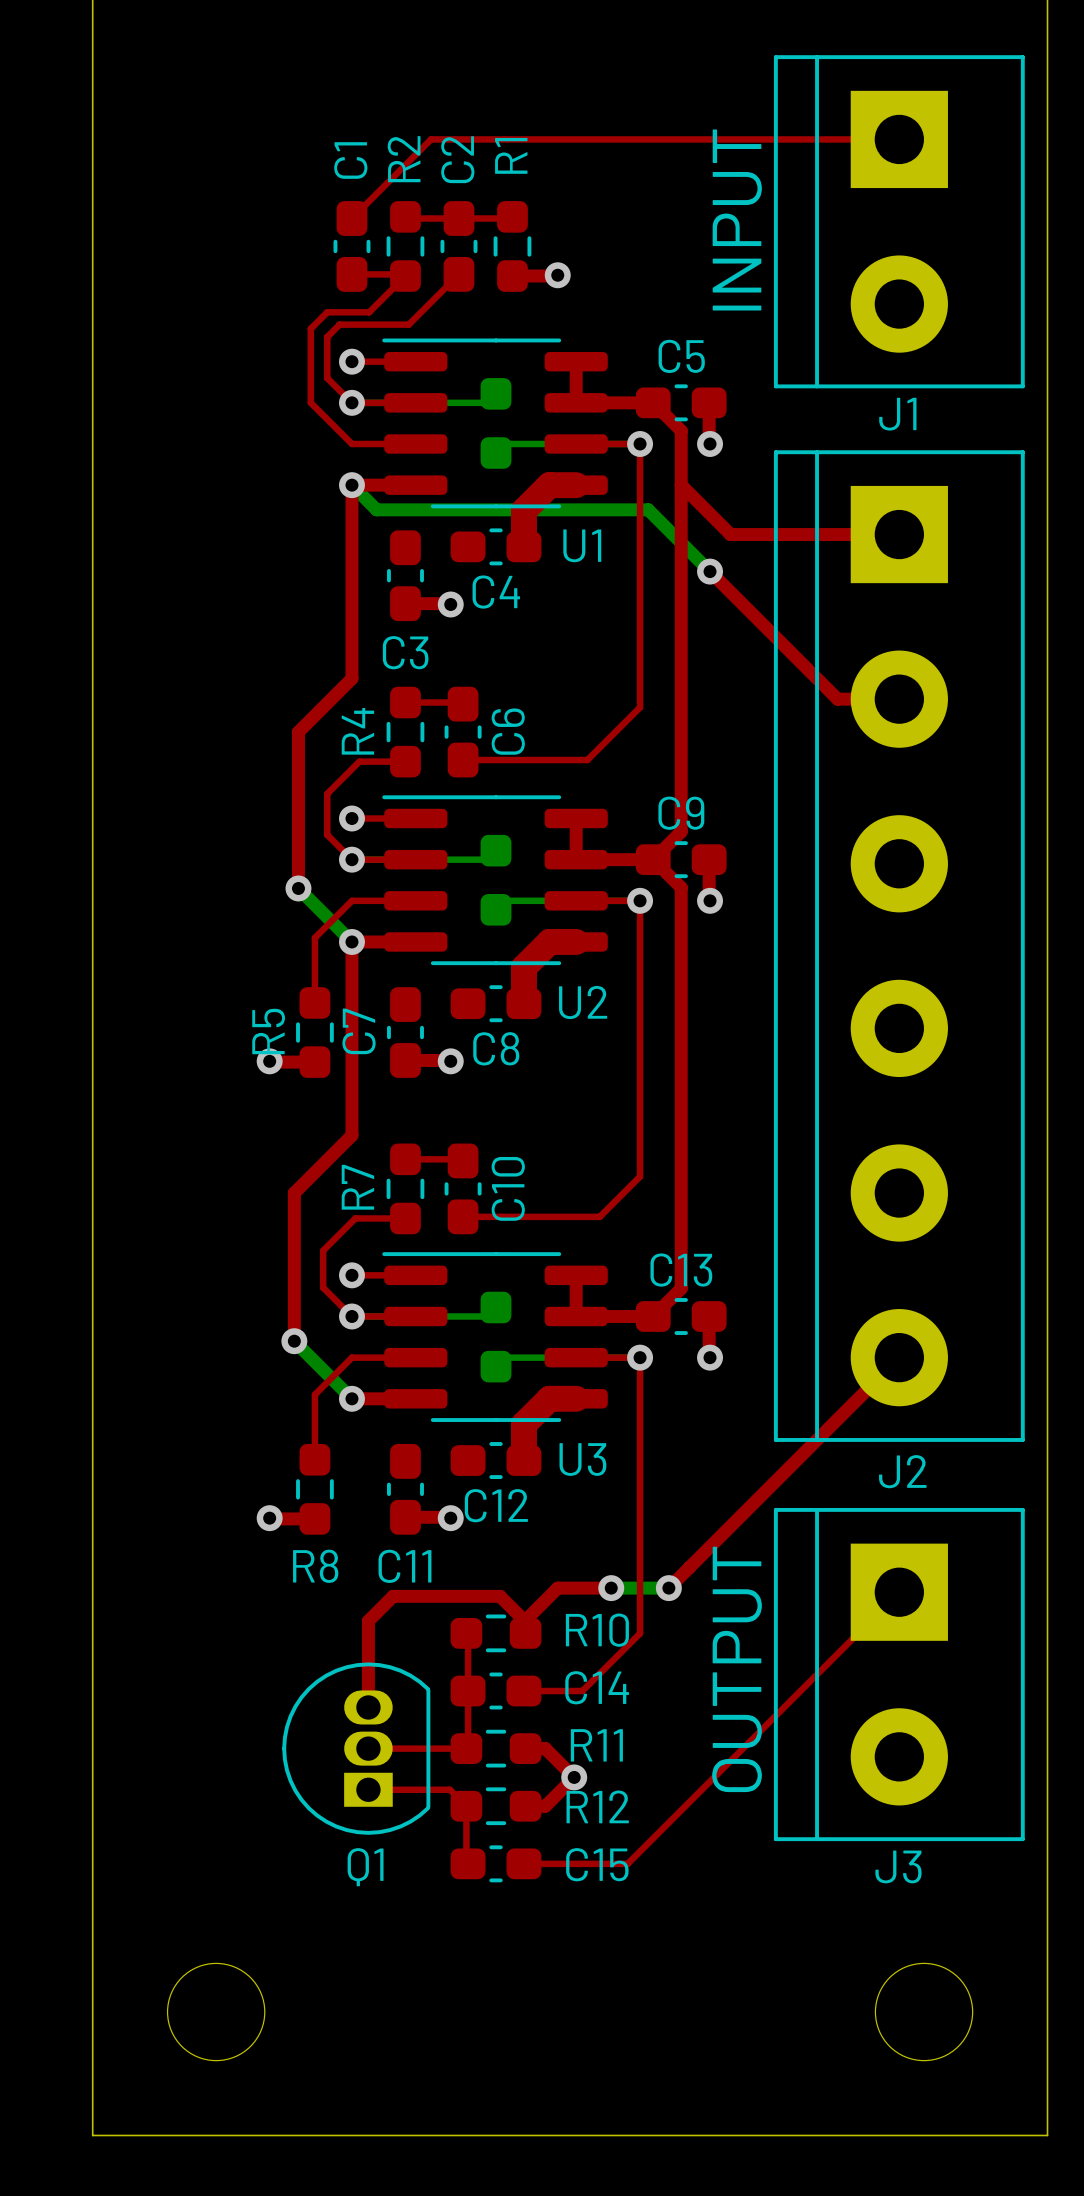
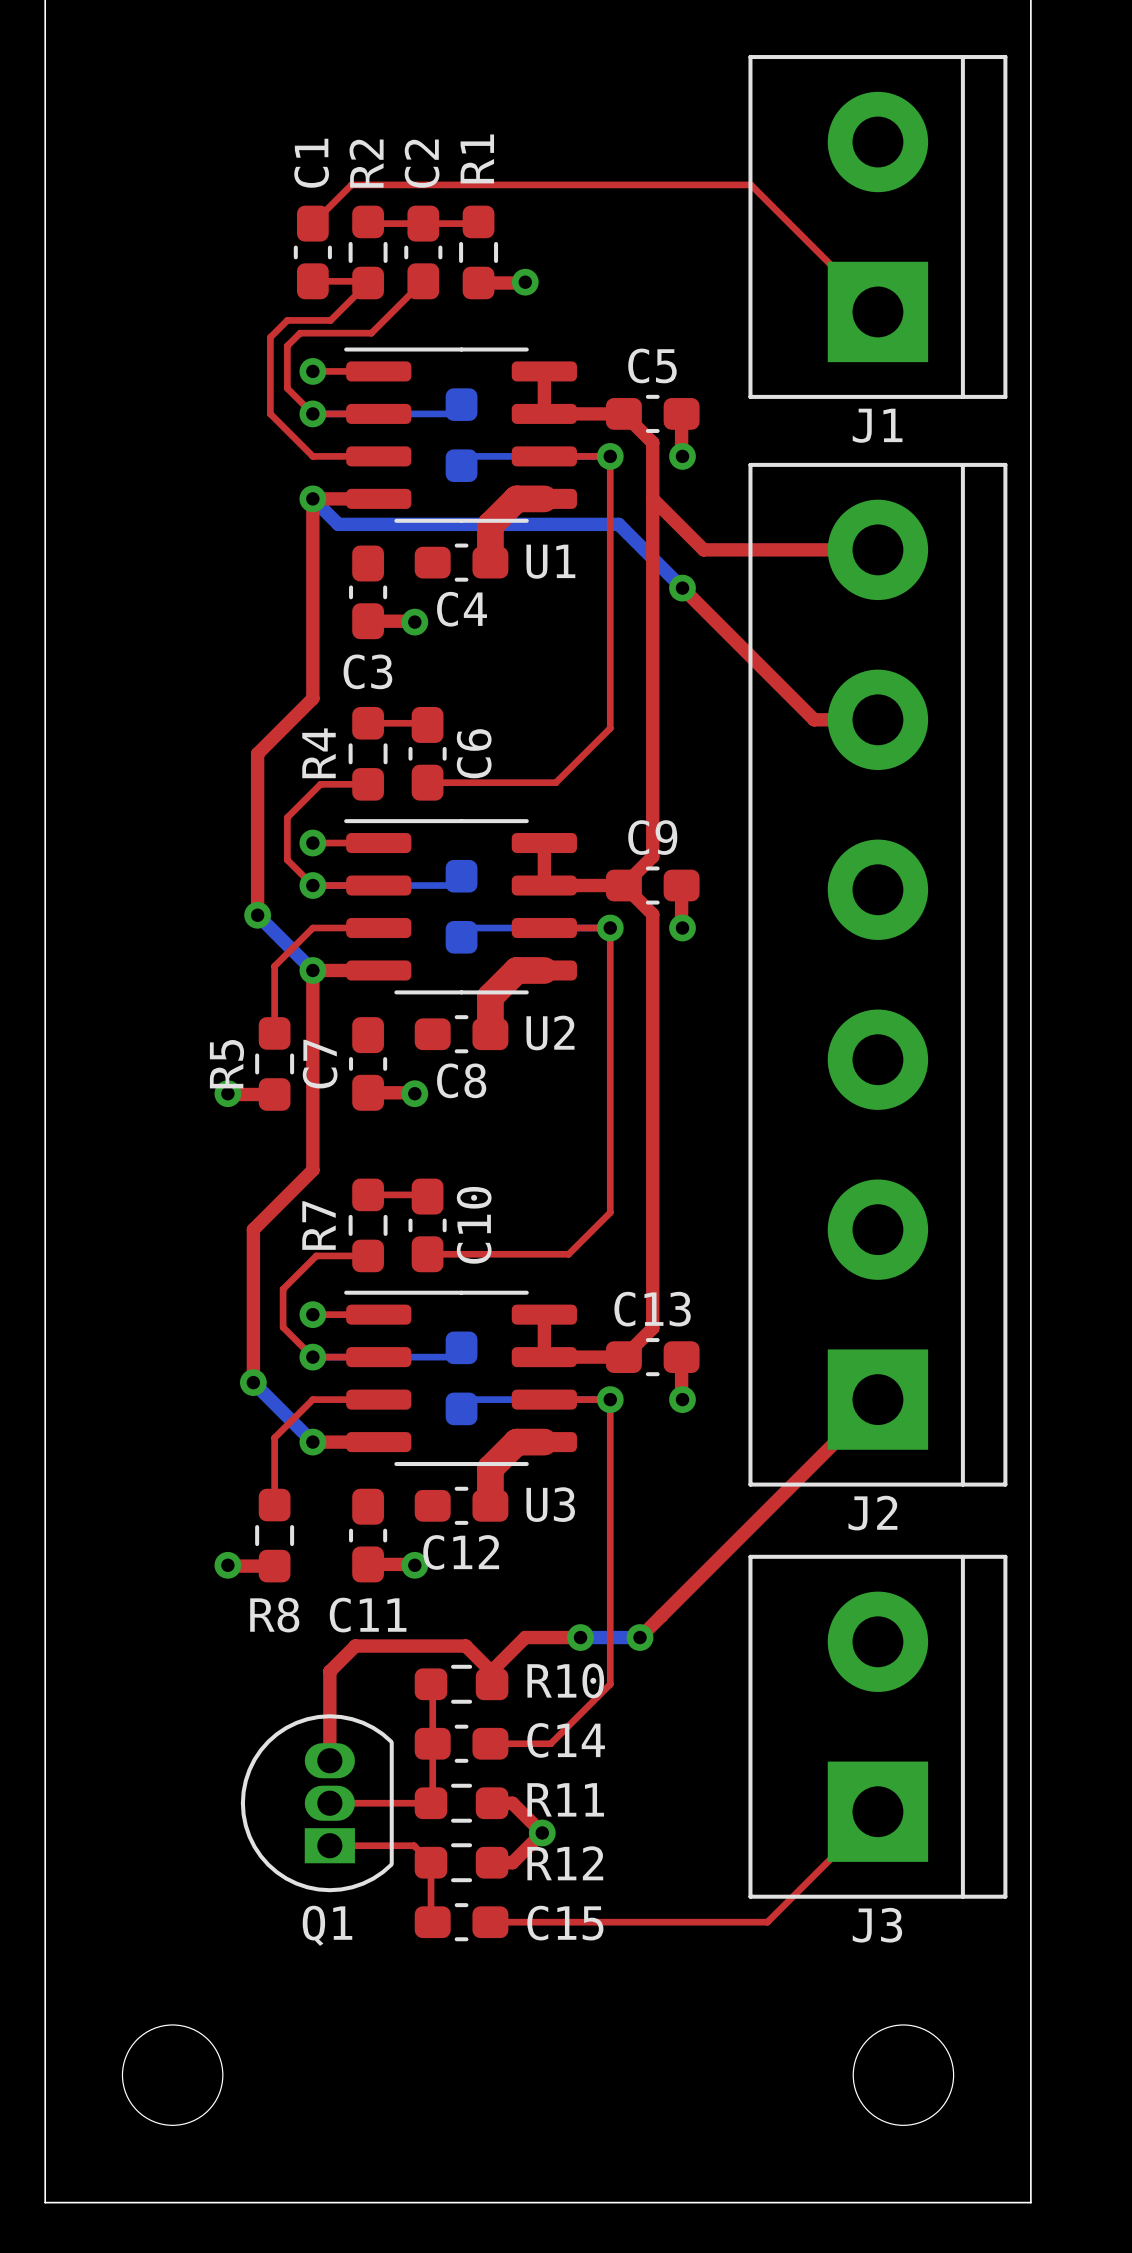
top track: (899, 139) (431, 139) (389, 181) -> (877, 311) (750, 184) (351, 184)
text: INPUT (737, 219) -> none
J1 rotation: 0° (899, 221) -> 180° (877, 226)
J2 rotation: 0° (899, 946) -> 180° (877, 974)
top track: (899, 1592) (627, 1863) -> (877, 1811) (767, 1922) (597, 1922)
text: OUTPUT (737, 1669) -> none
J3 rotation: 0° (899, 1674) -> 180° (877, 1726)

